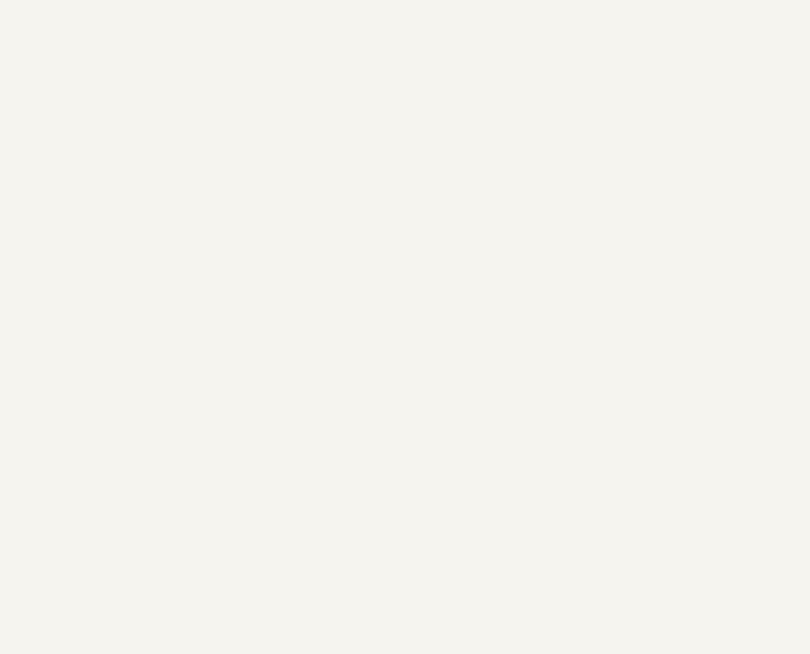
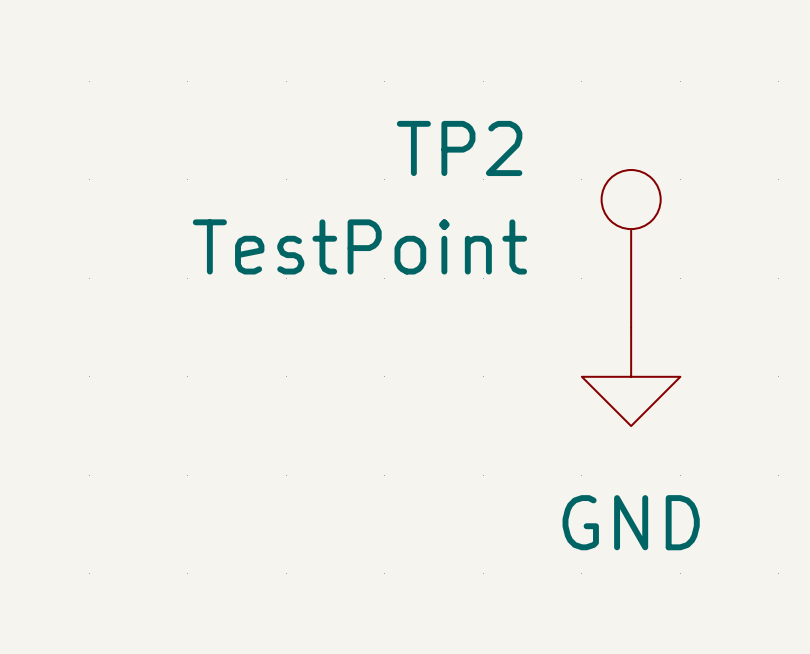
TP2: none -> TestPoint (631, 248)
power symbol: none -> GND (631, 376)

